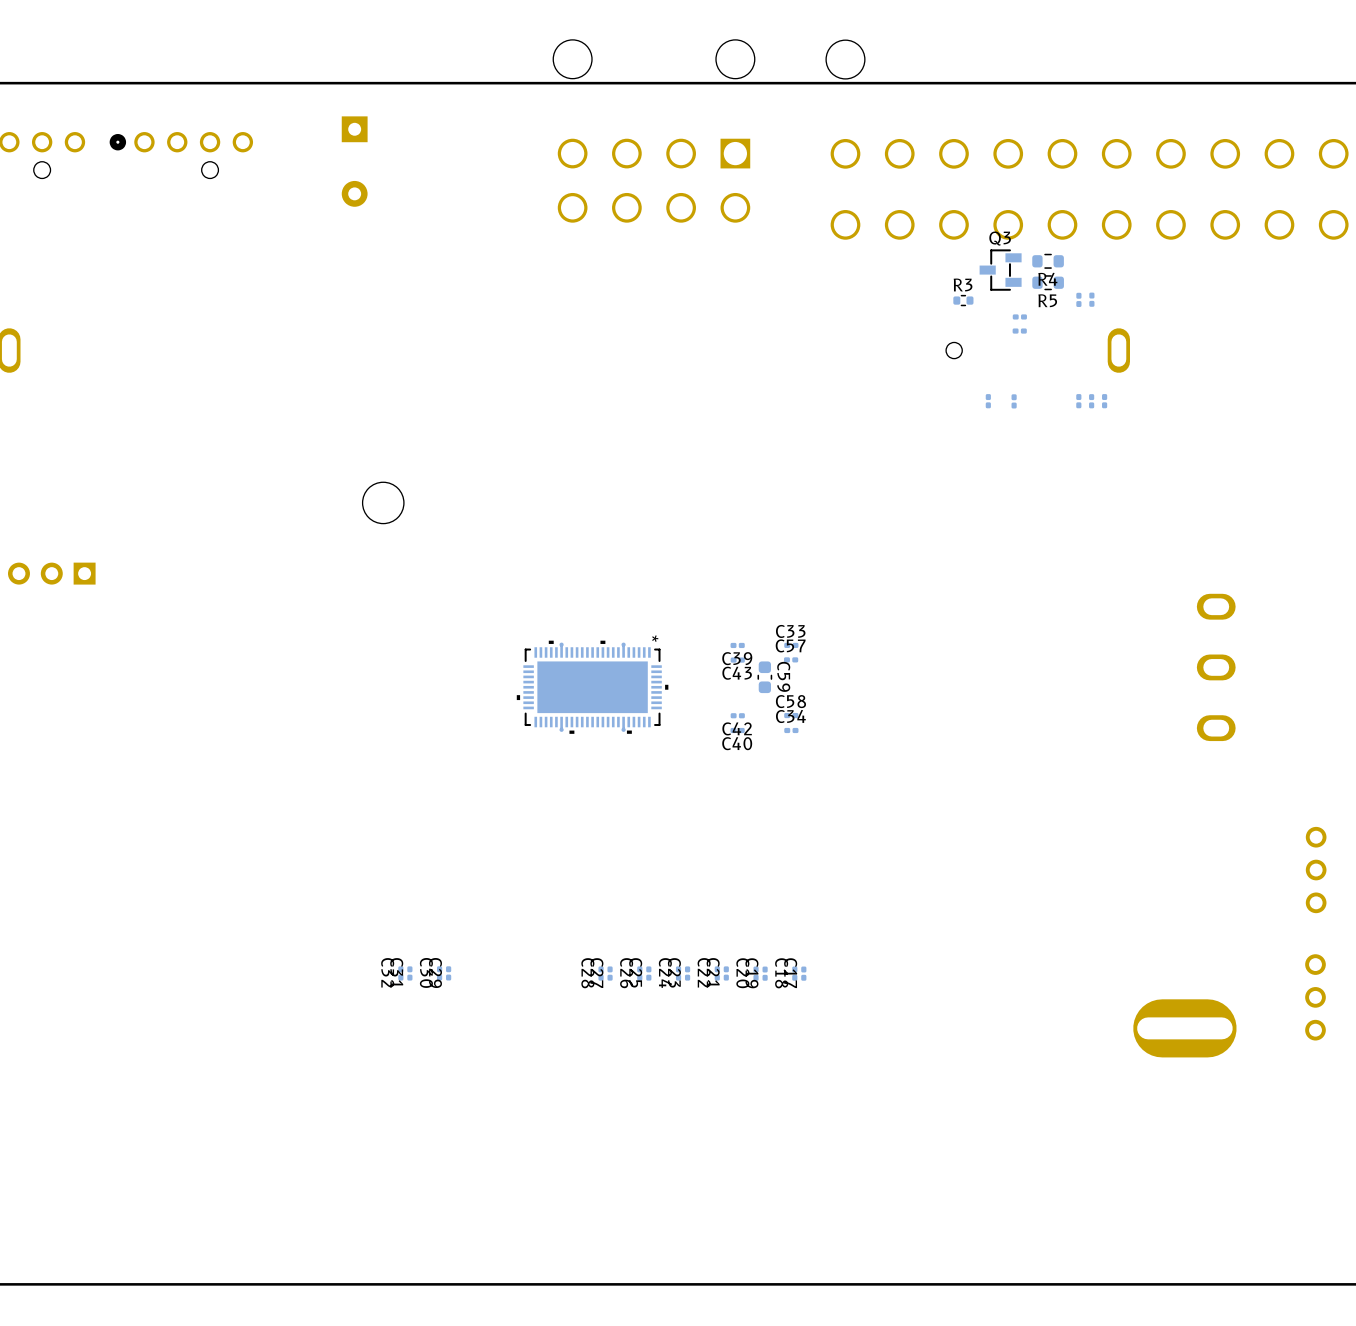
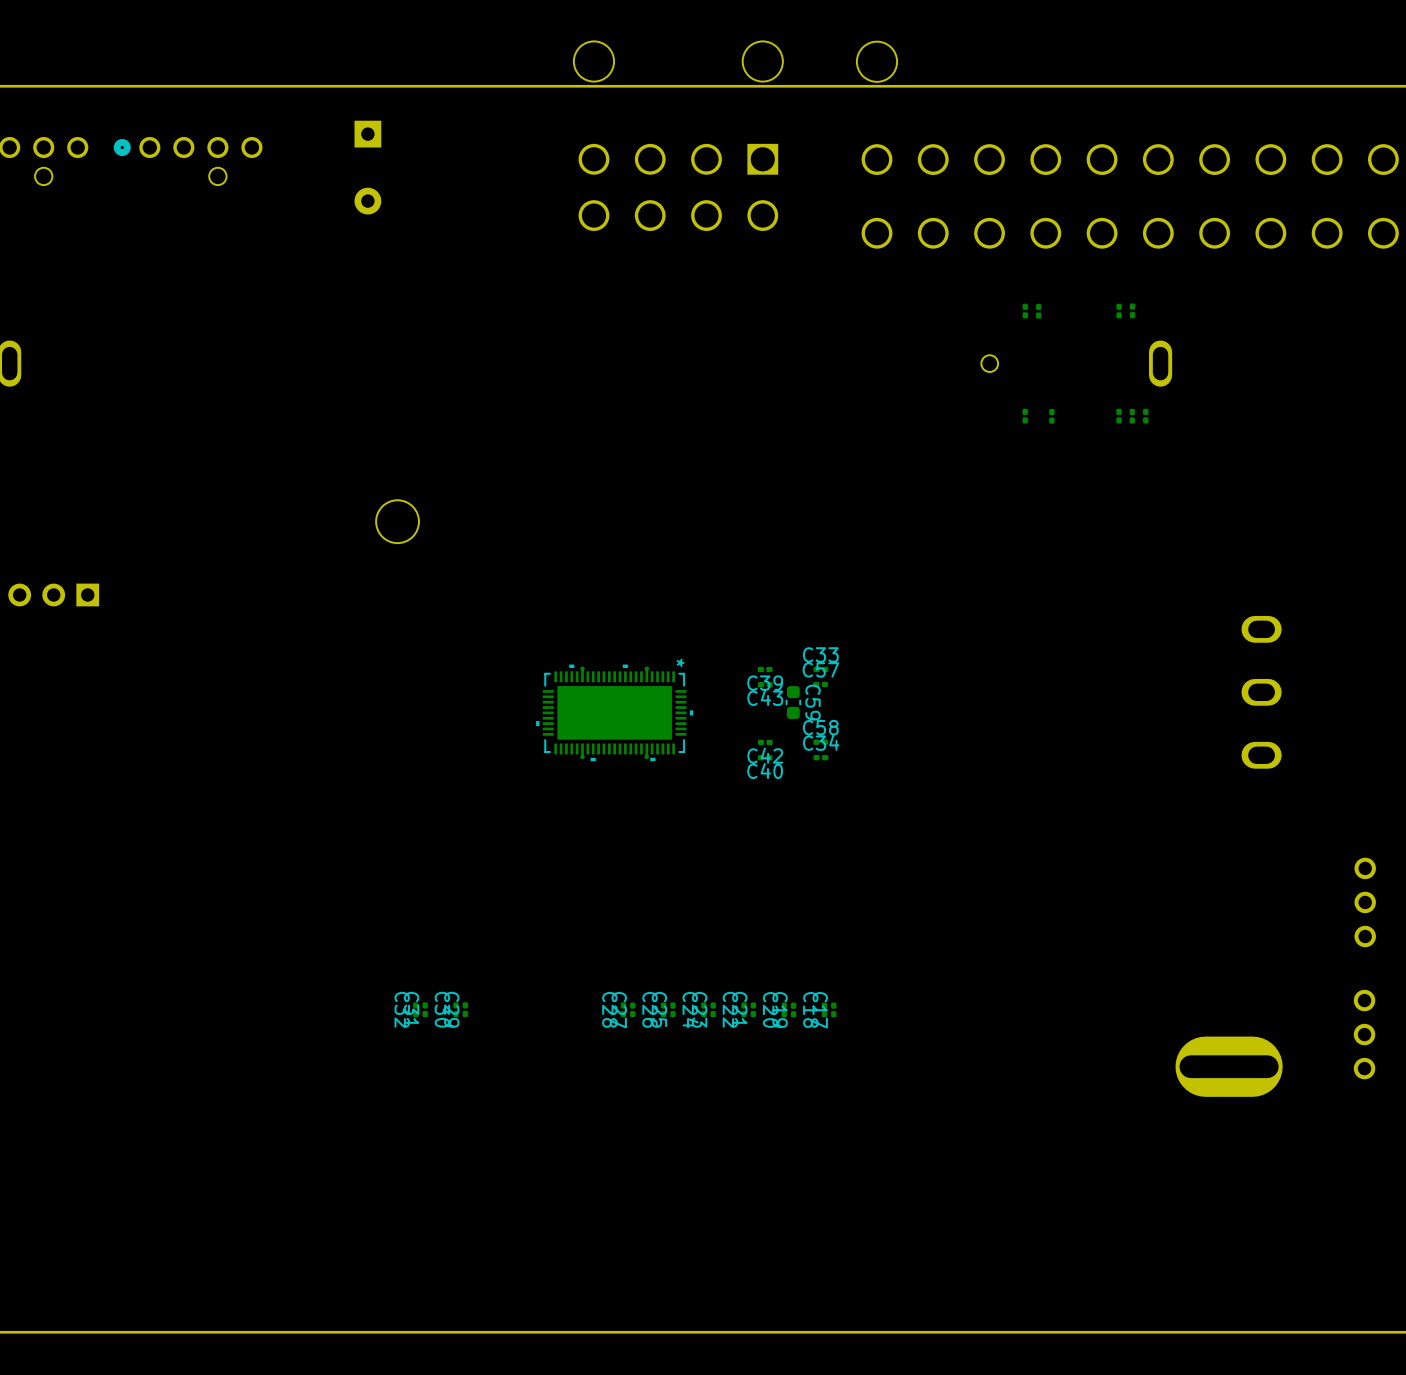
R4: (1048, 261) -> none
Q3: (1000, 270) -> none
R5: (1048, 282) -> none
part: none -> (1025, 311)
R3: (963, 300) -> none
part: none -> (1038, 311)
part: (1019, 316) -> none
part: (1019, 331) -> none

